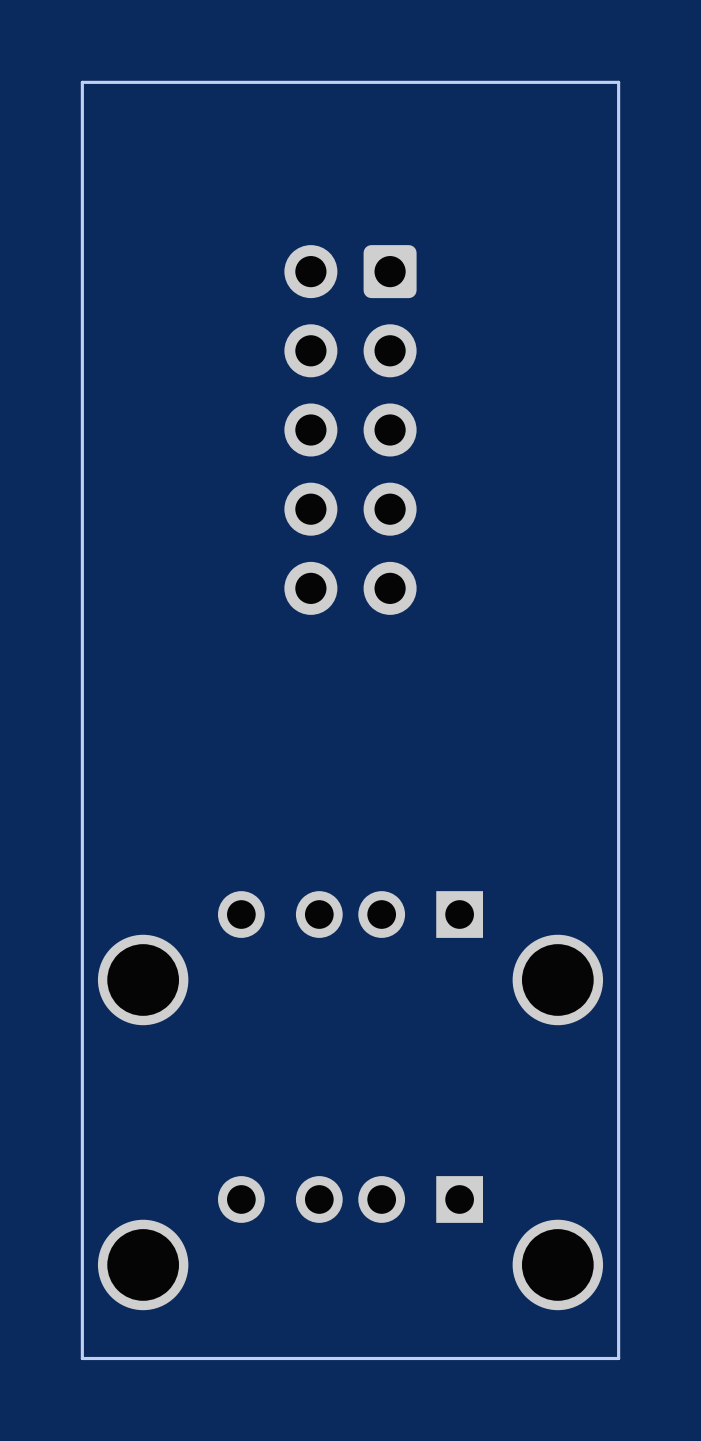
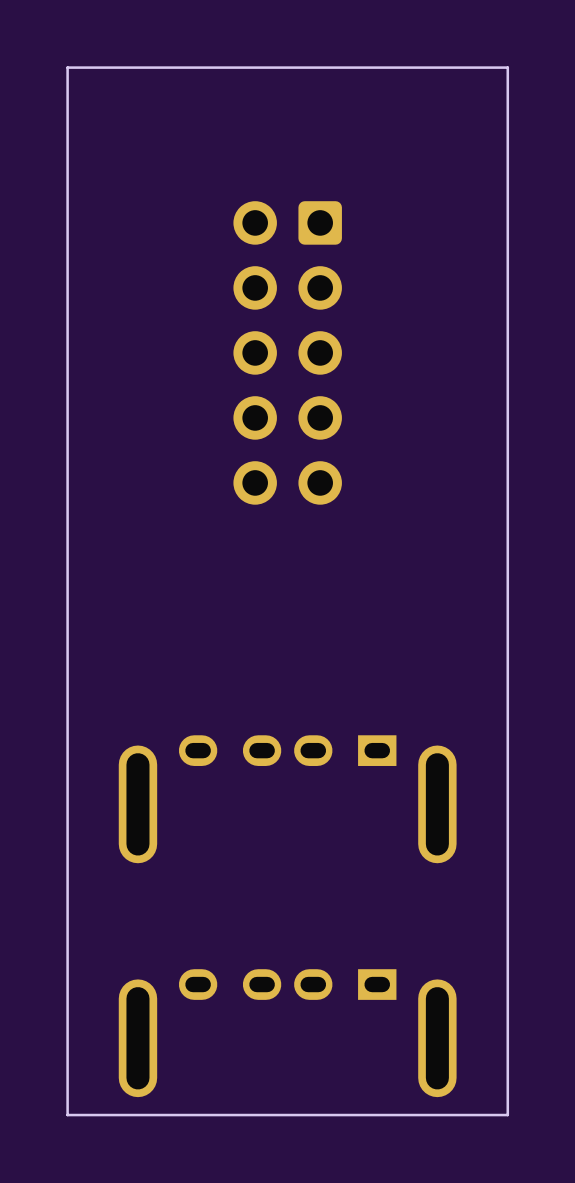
part footprint: [97, 891, 604, 1026] -> [118, 735, 457, 864]
part footprint: [97, 1176, 604, 1311] -> [118, 969, 457, 1098]

